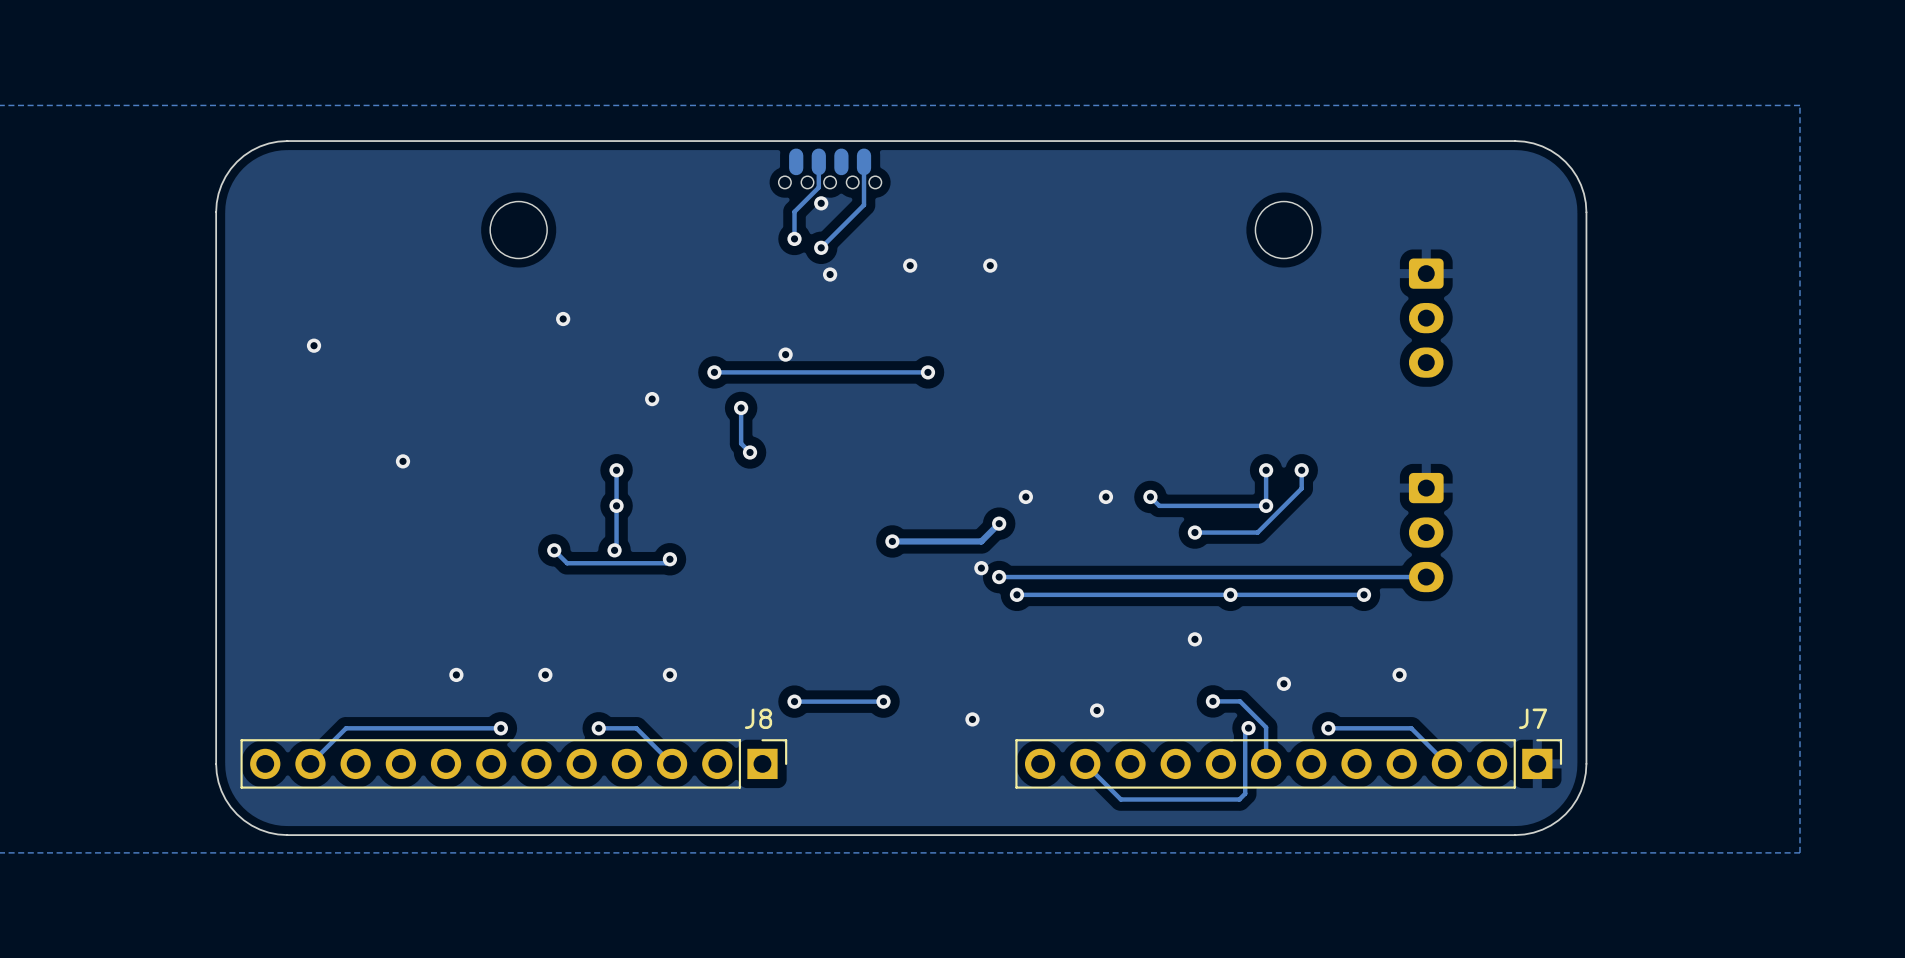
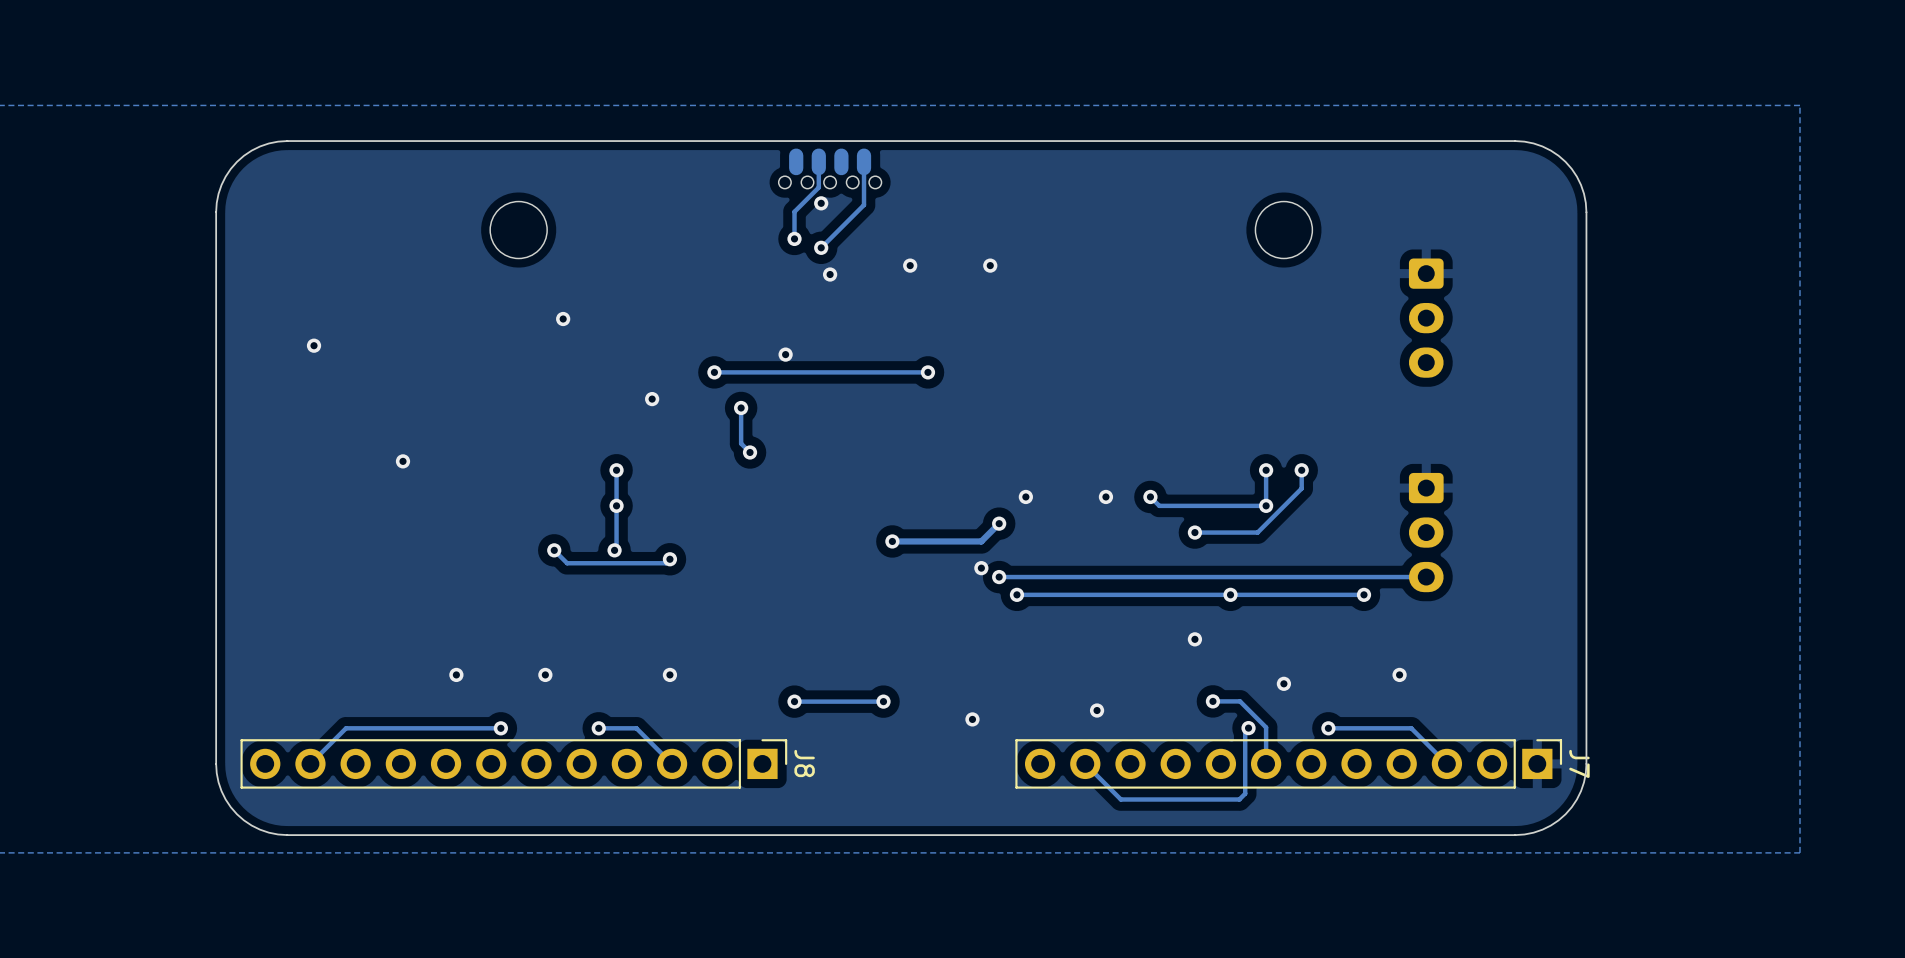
J8 name rotation: 0° (758, 718) -> 90° clockwise (804, 763)
J8 name position: J8 (758, 718) -> J8 (804, 763)
J7 name rotation: 0° (1533, 718) -> 90° clockwise (1579, 763)
J7 name position: J7 (1533, 718) -> J7 (1579, 763)

